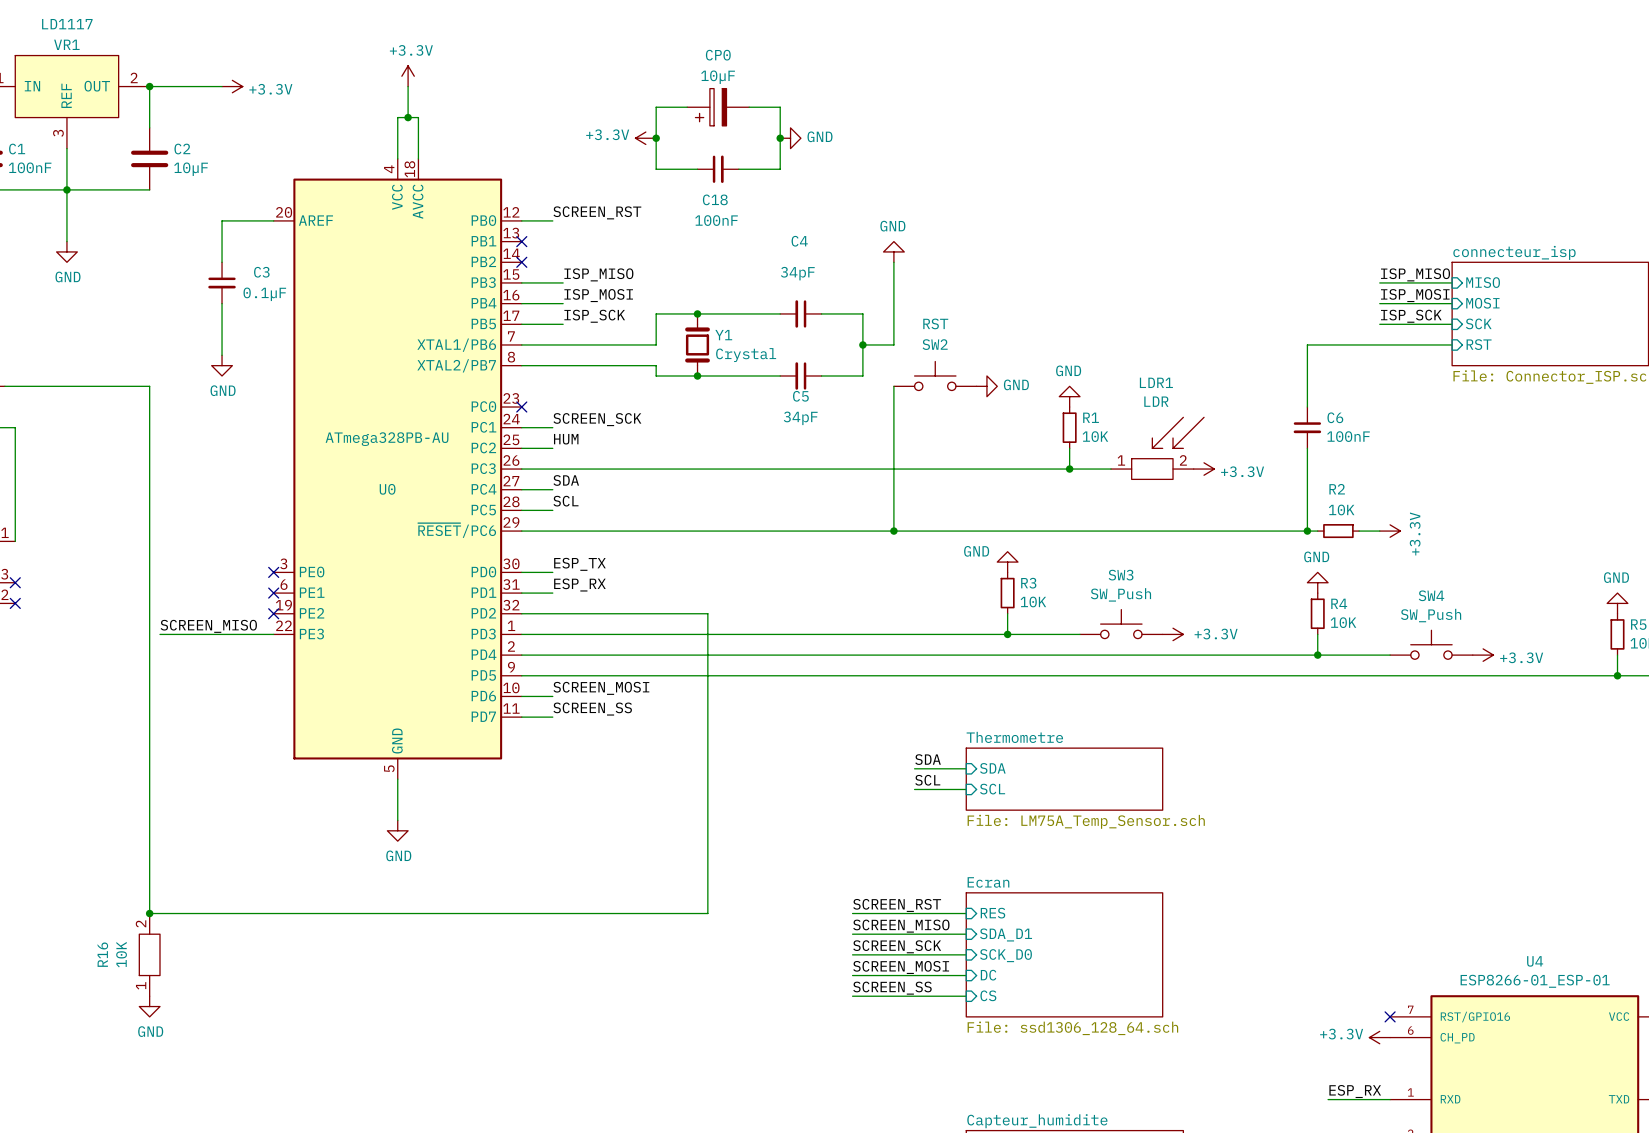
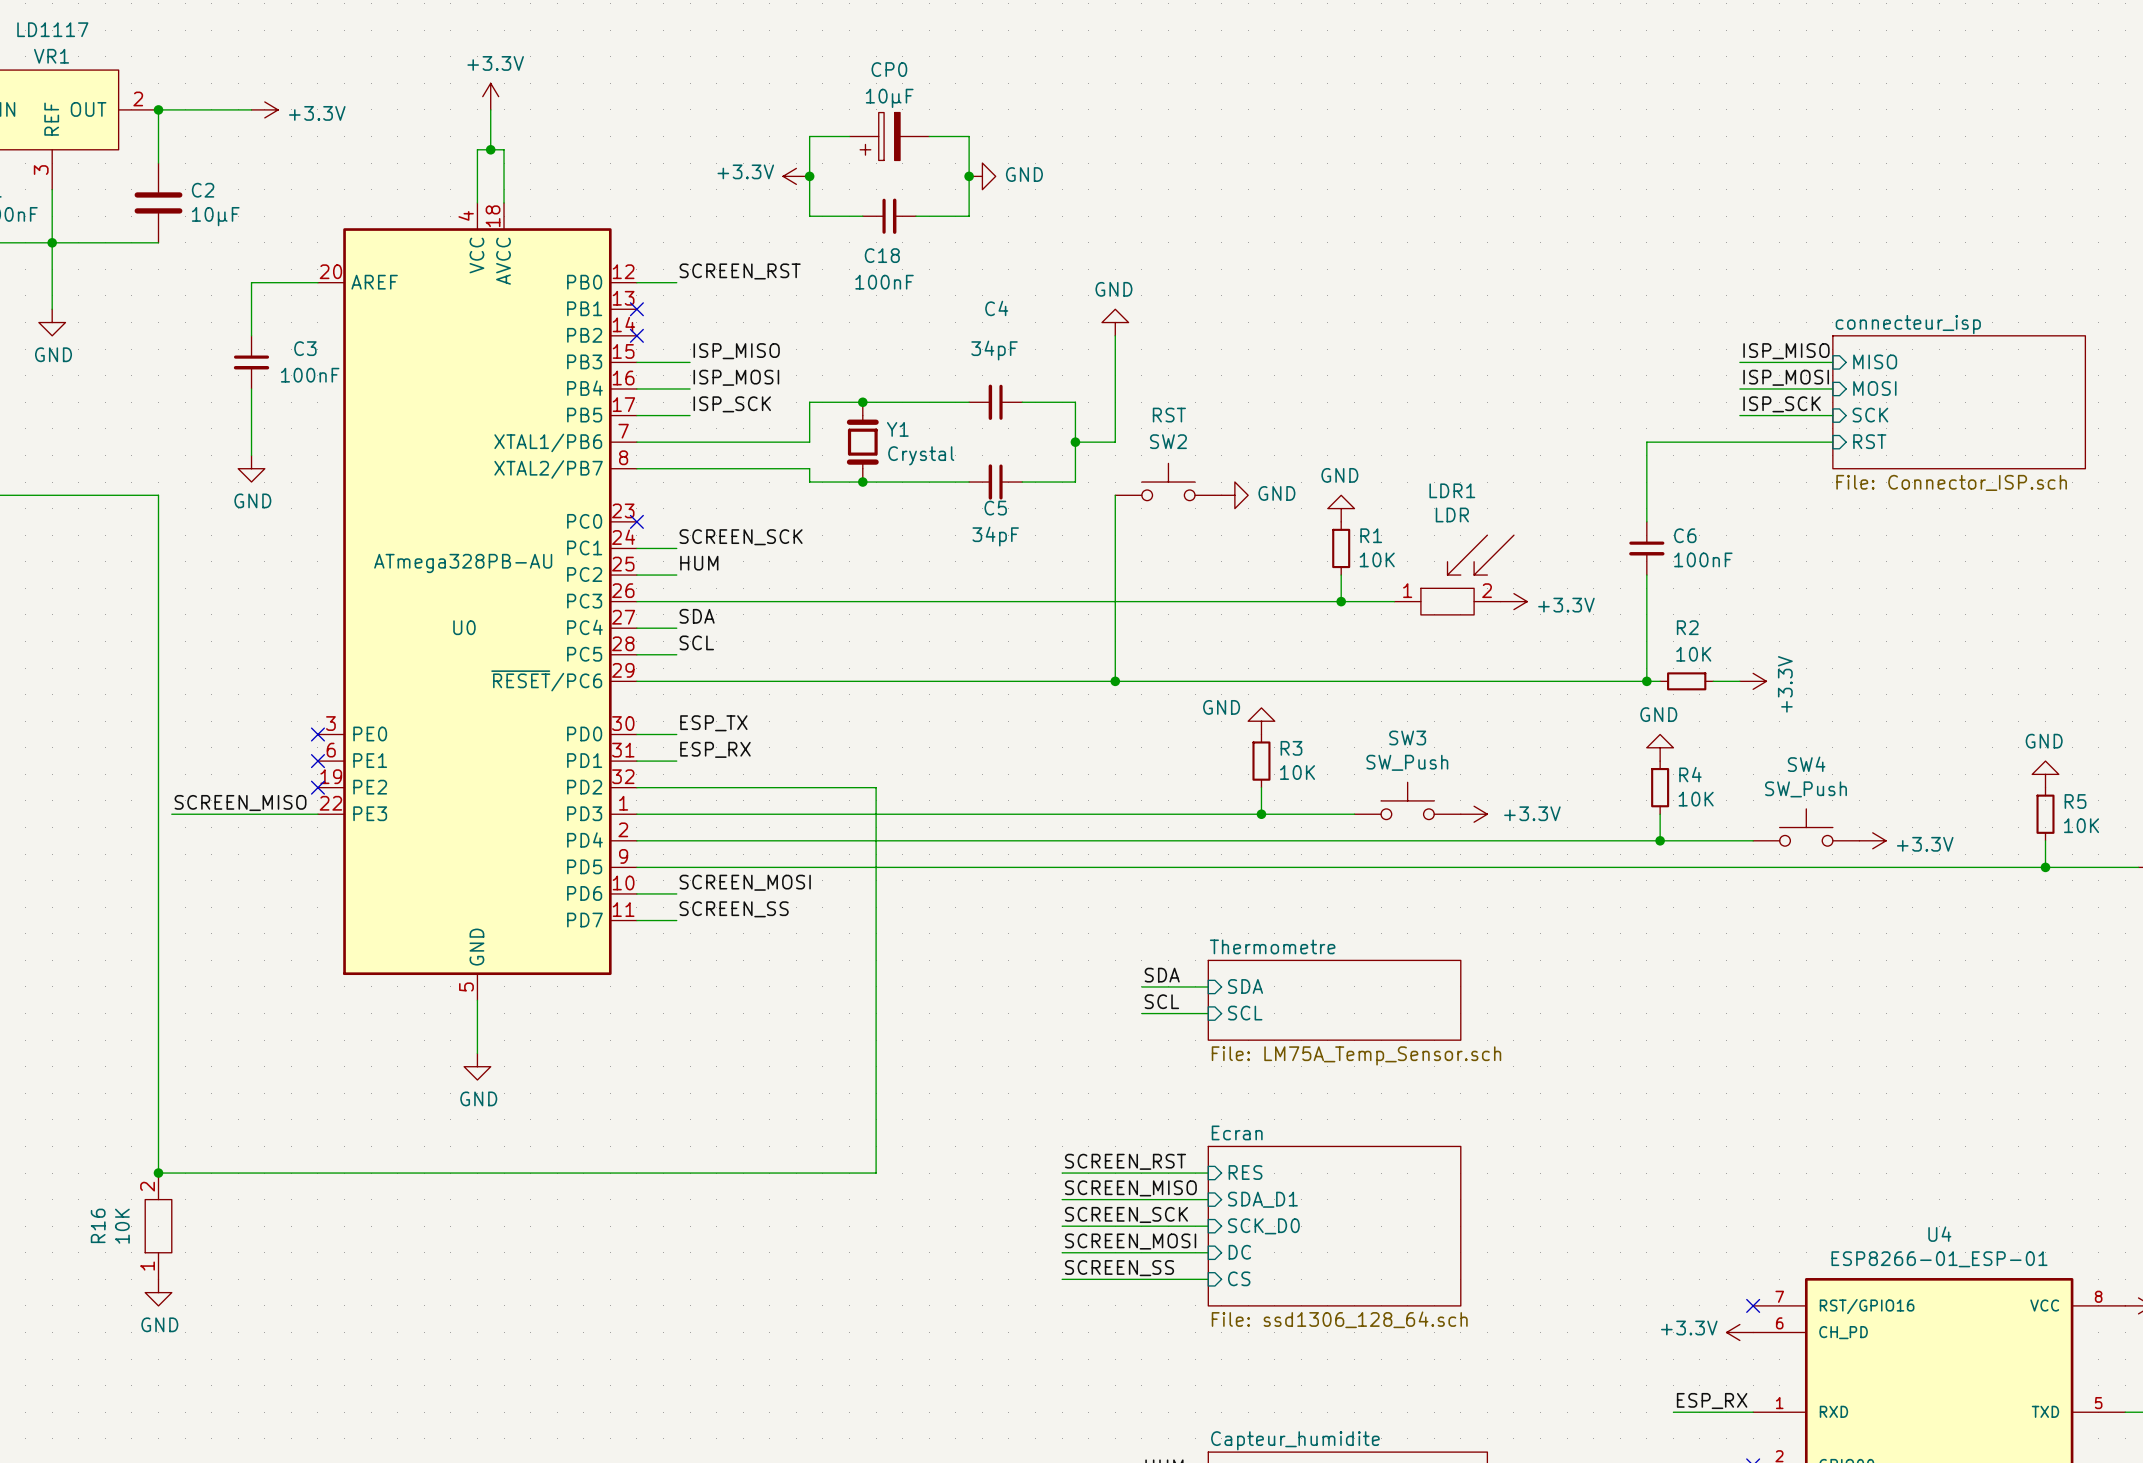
C3 value: 0.1µF (264, 294) -> 100nF (310, 375)

